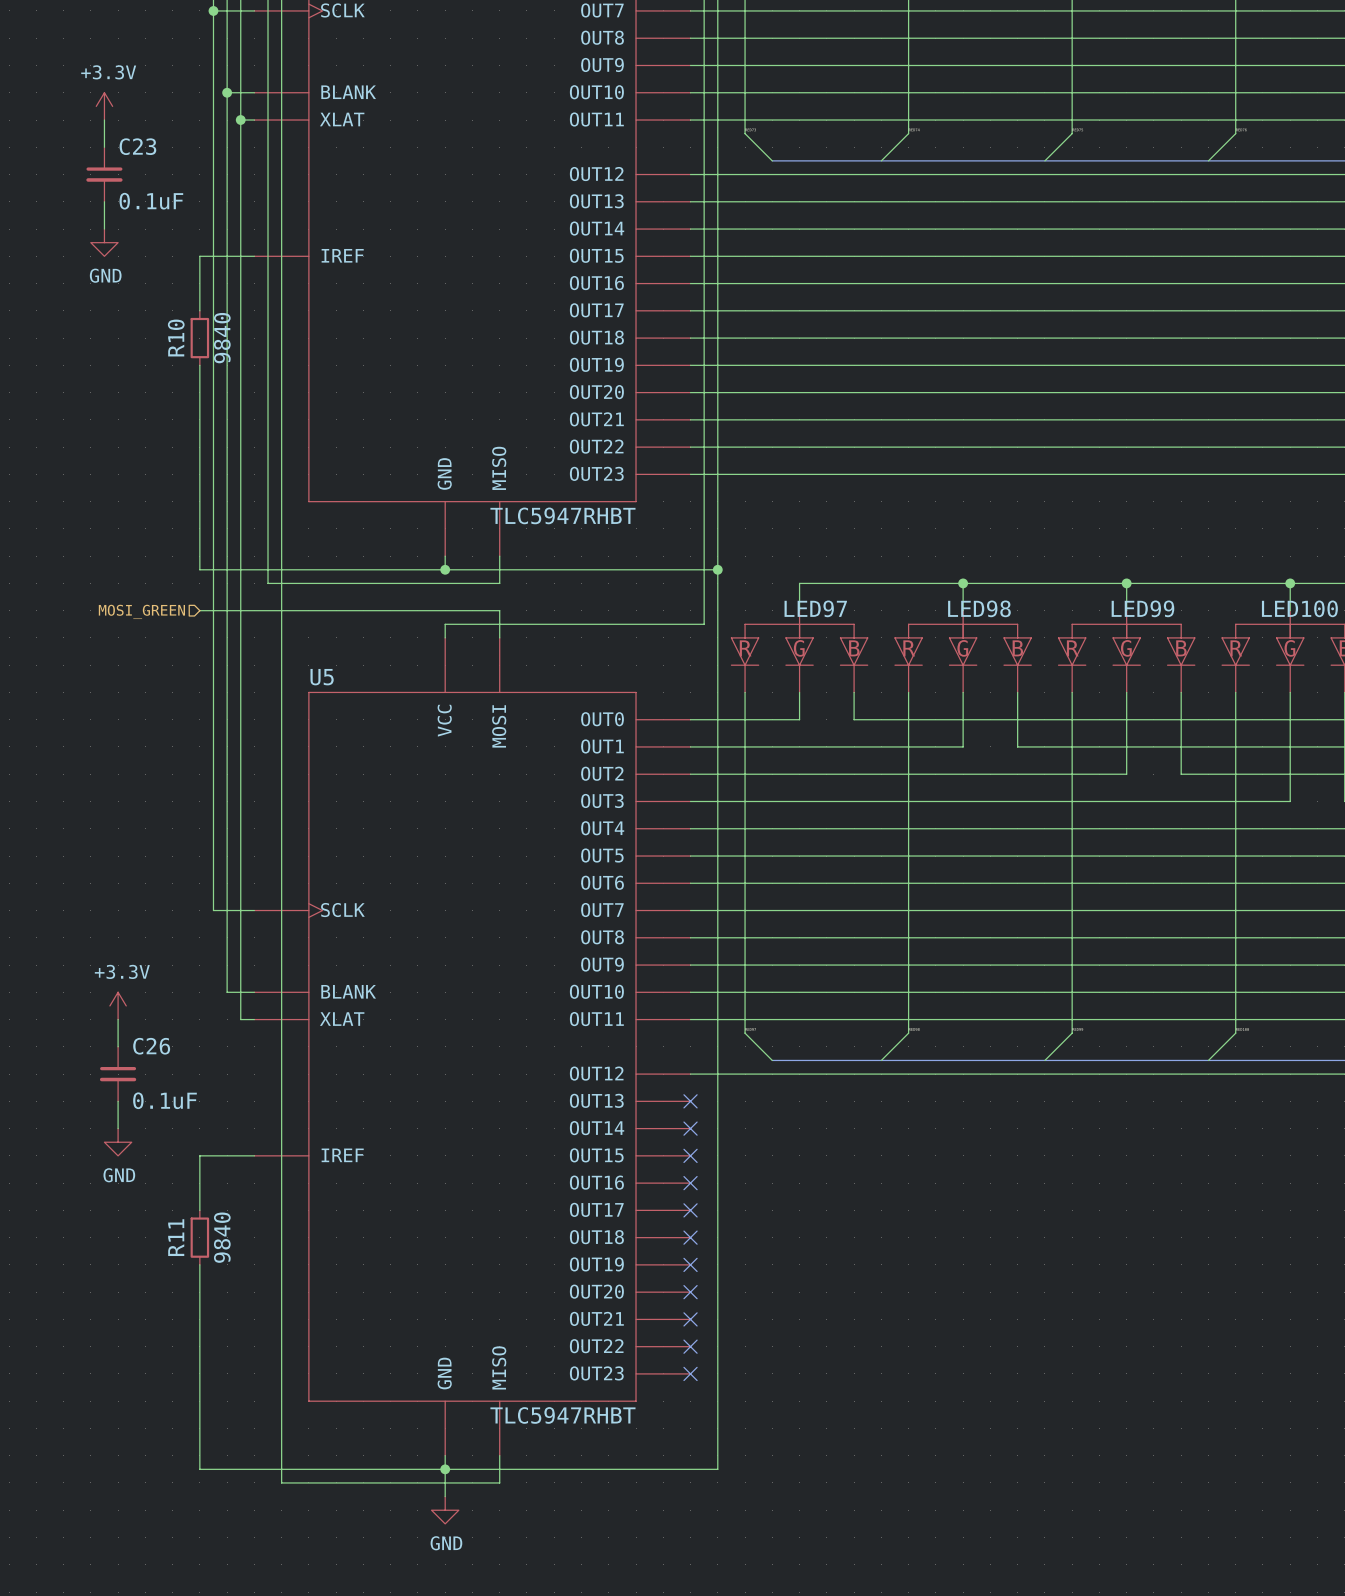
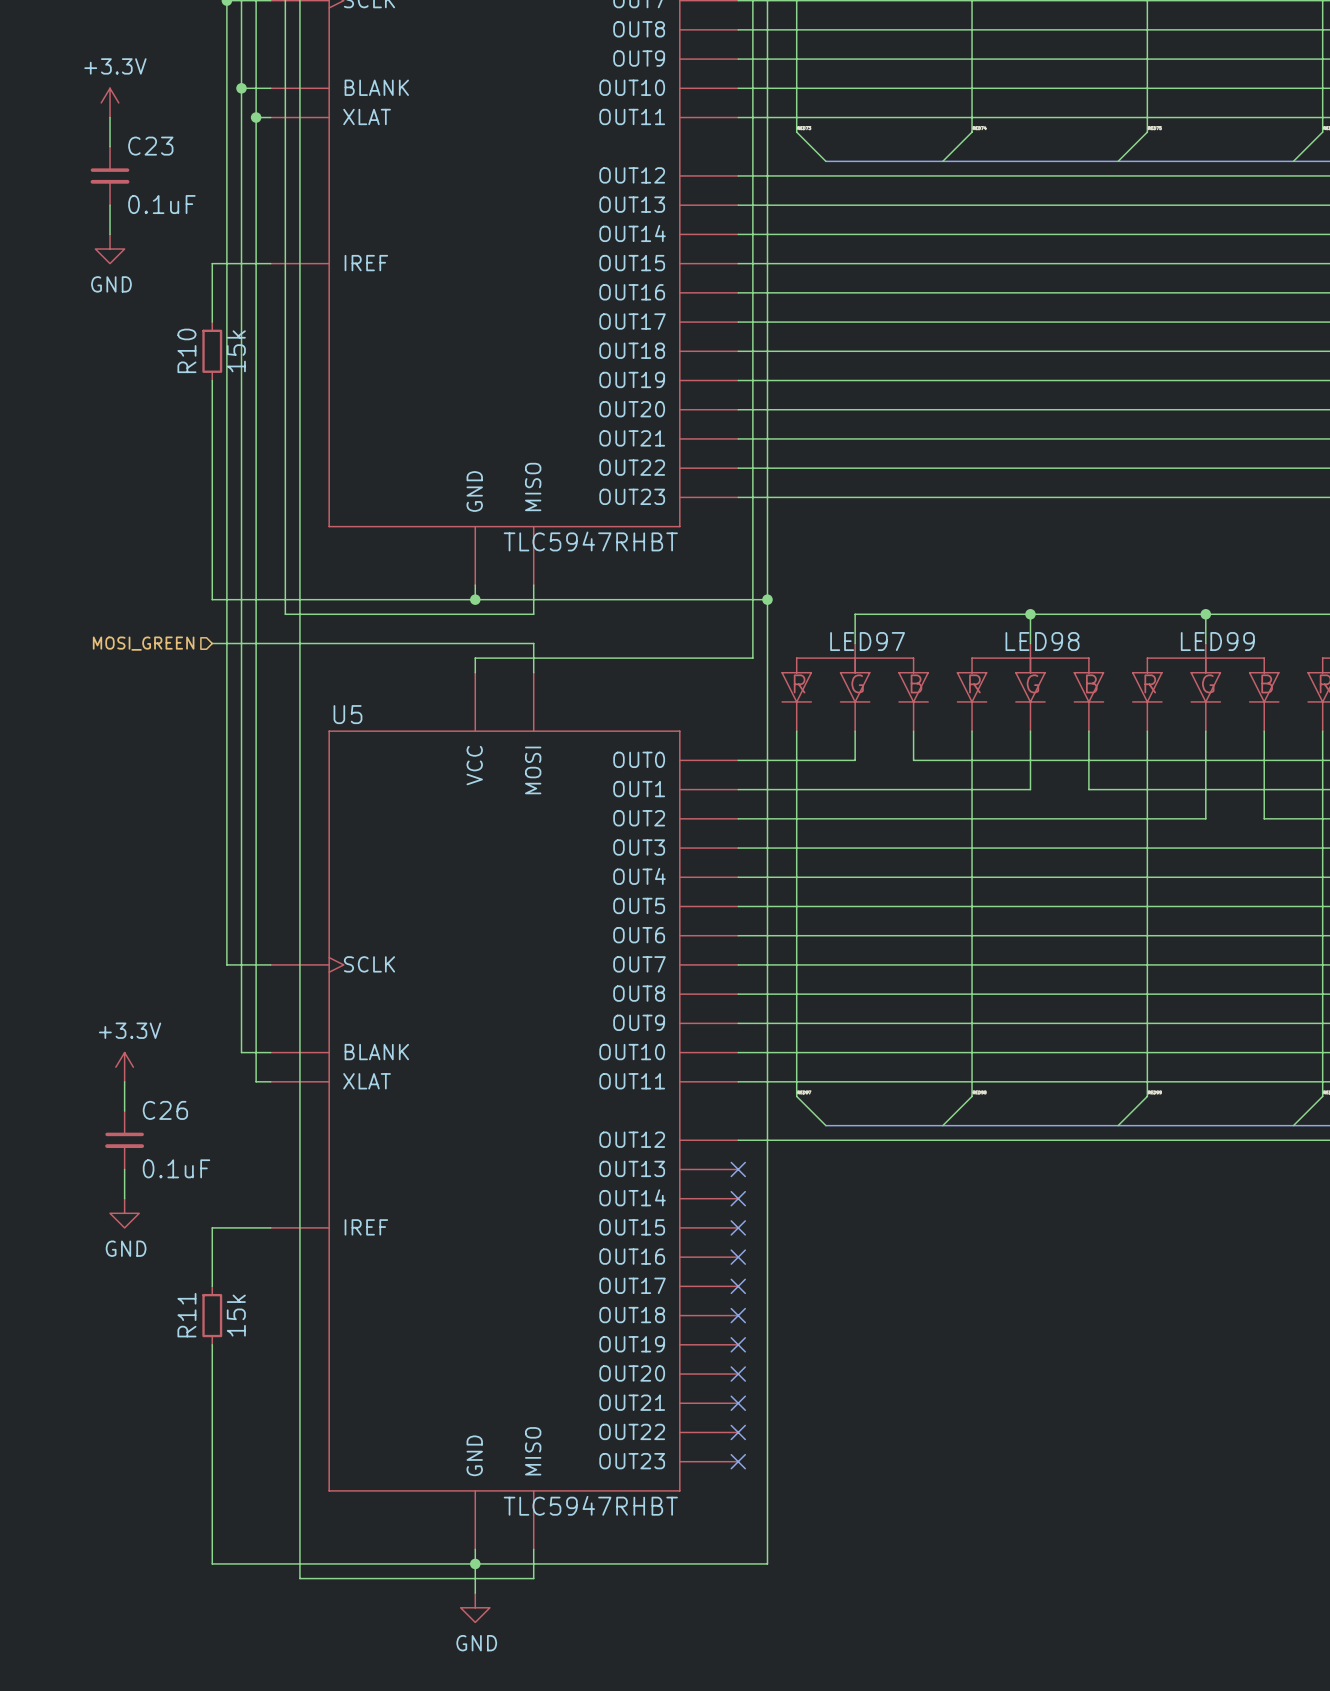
R10 value: 9840 (222, 338) -> 15k (236, 351)
R11 value: 9840 (222, 1237) -> 15k (236, 1315)

